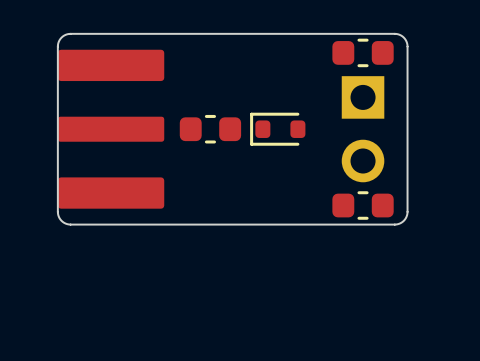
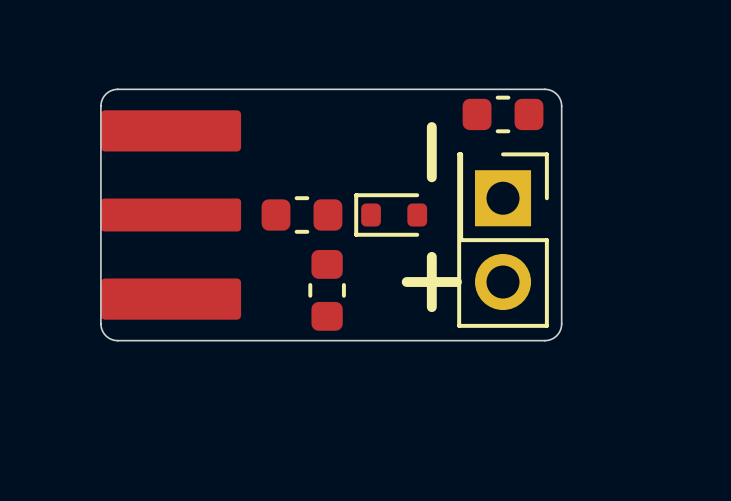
line: none -> (431, 127) (431, 177)
part side: bottom (363, 129) -> top (503, 240)
line: none -> (431, 256) (431, 307)
line: none -> (406, 282) (456, 282)
part rotation: 0° (363, 205) -> 90° clockwise (327, 290)
part position: (363, 205) -> (327, 290)

